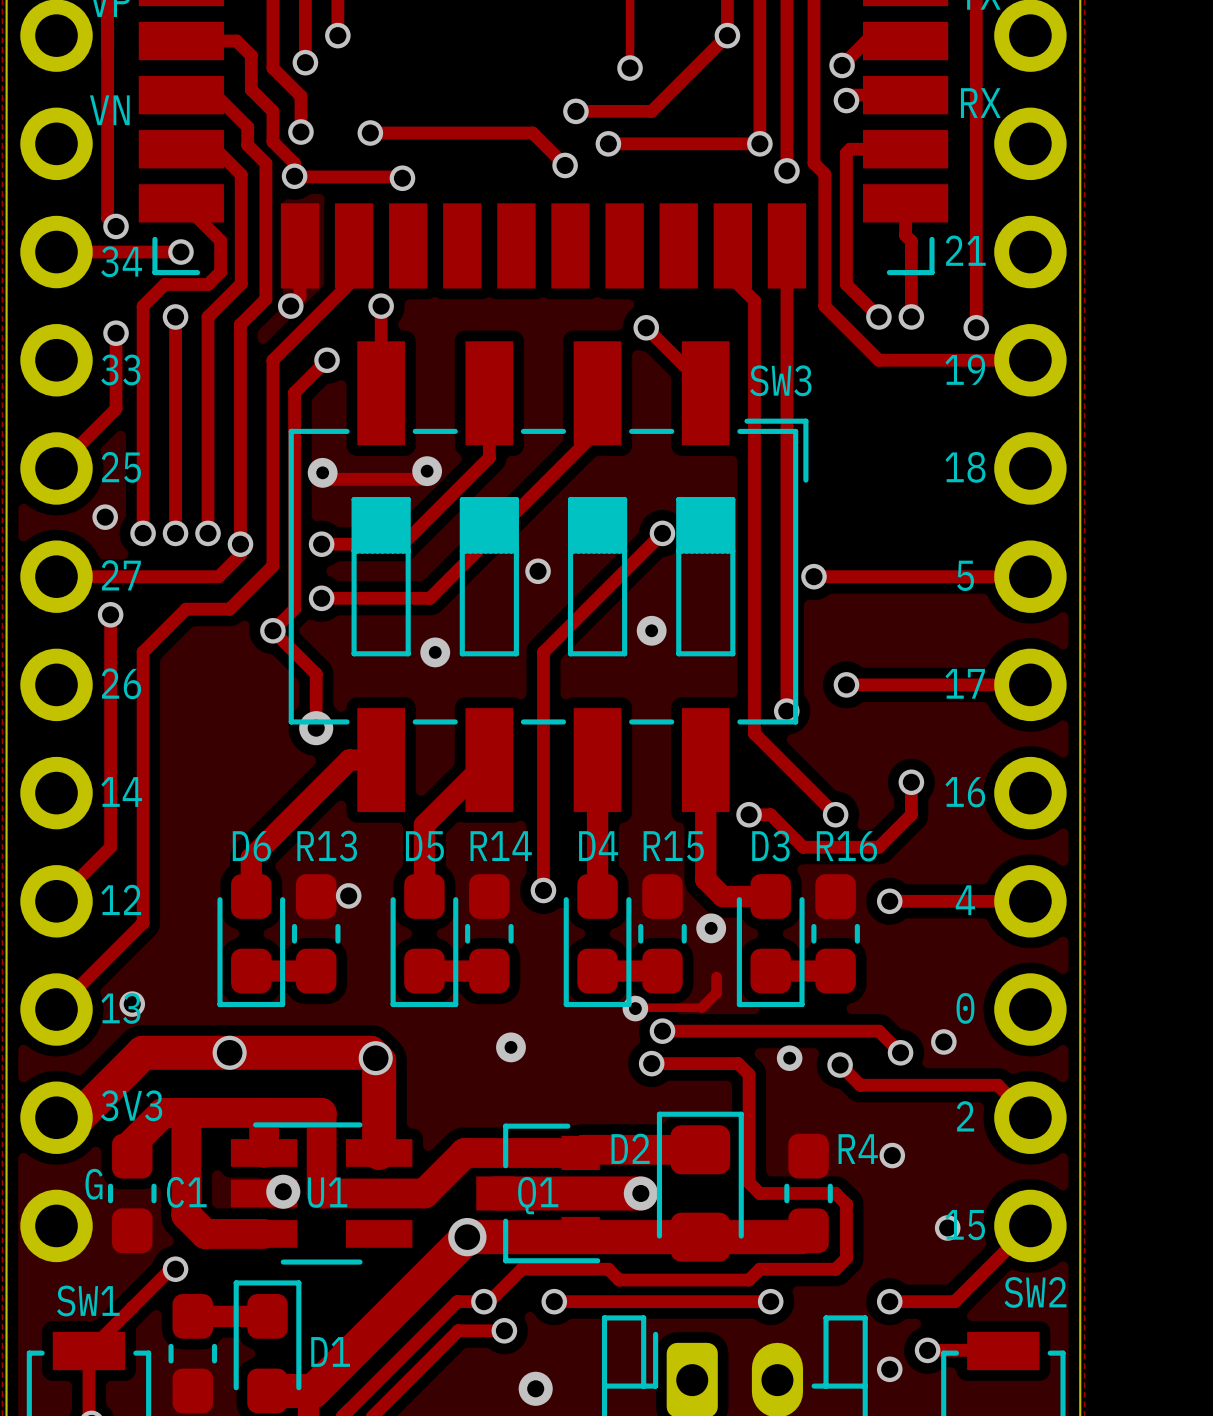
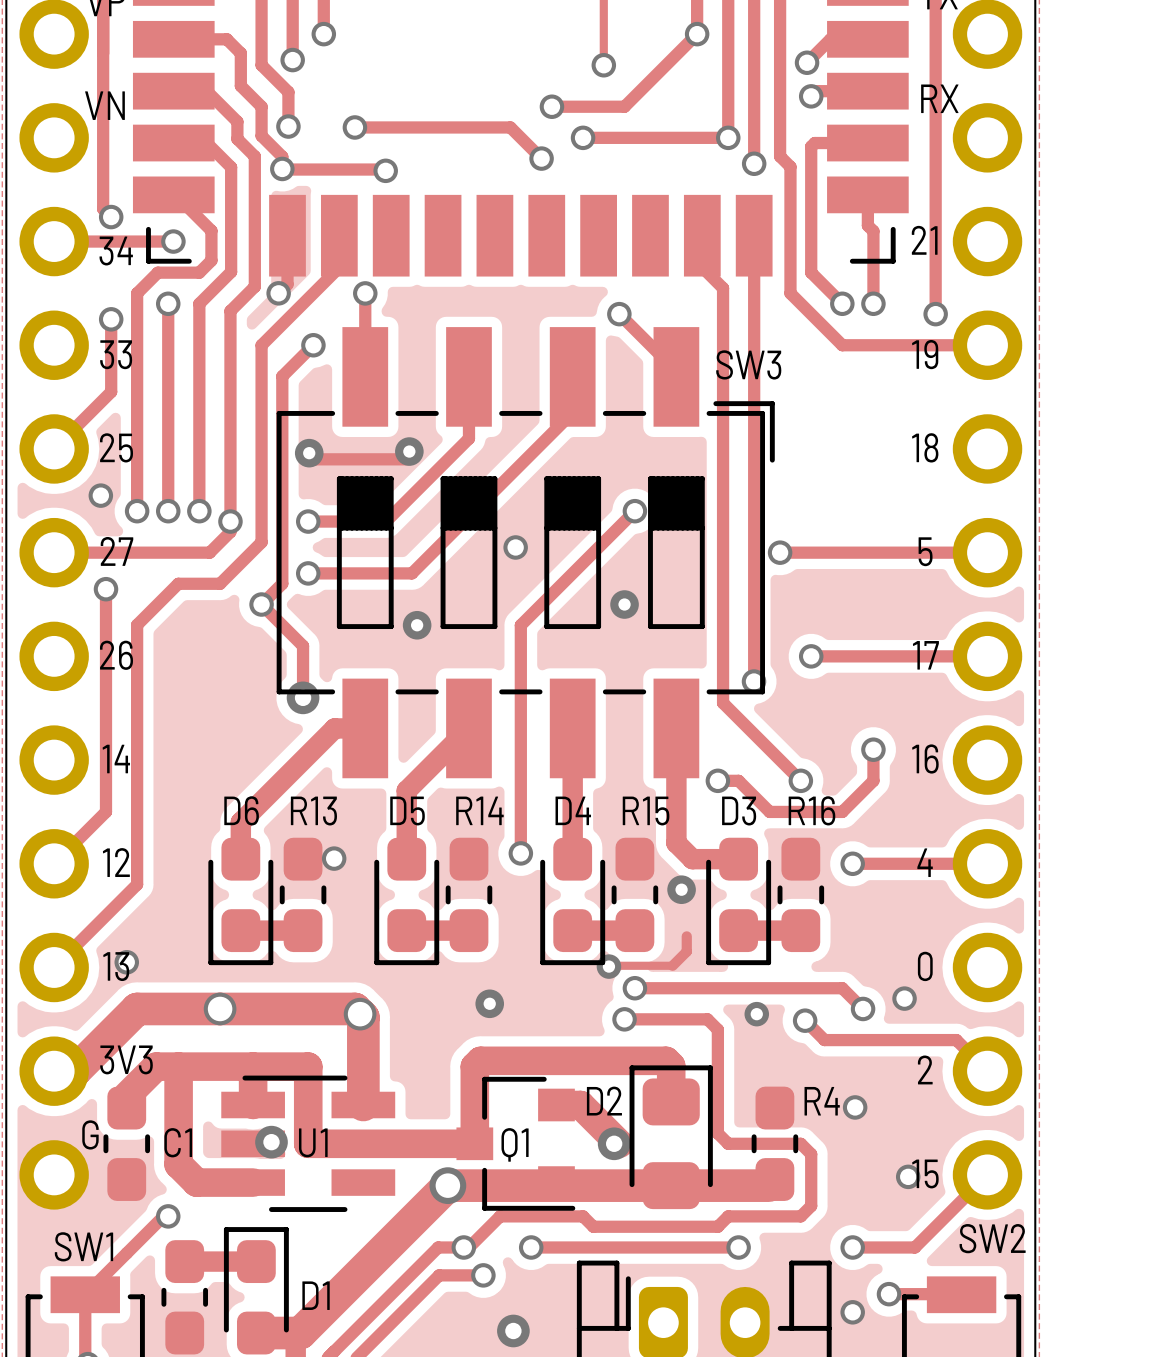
track: (700, 1149) (583, 1149) (580, 1153) (464, 1153) (424, 1193) -> (671, 1101) (671, 1066) (666, 1060) (480, 1060) (474, 1066) (474, 1143) (406, 1143)
track: none -> (556, 1105) (580, 1105) (619, 1143)
track: (495, 1193) (640, 1193) -> none

